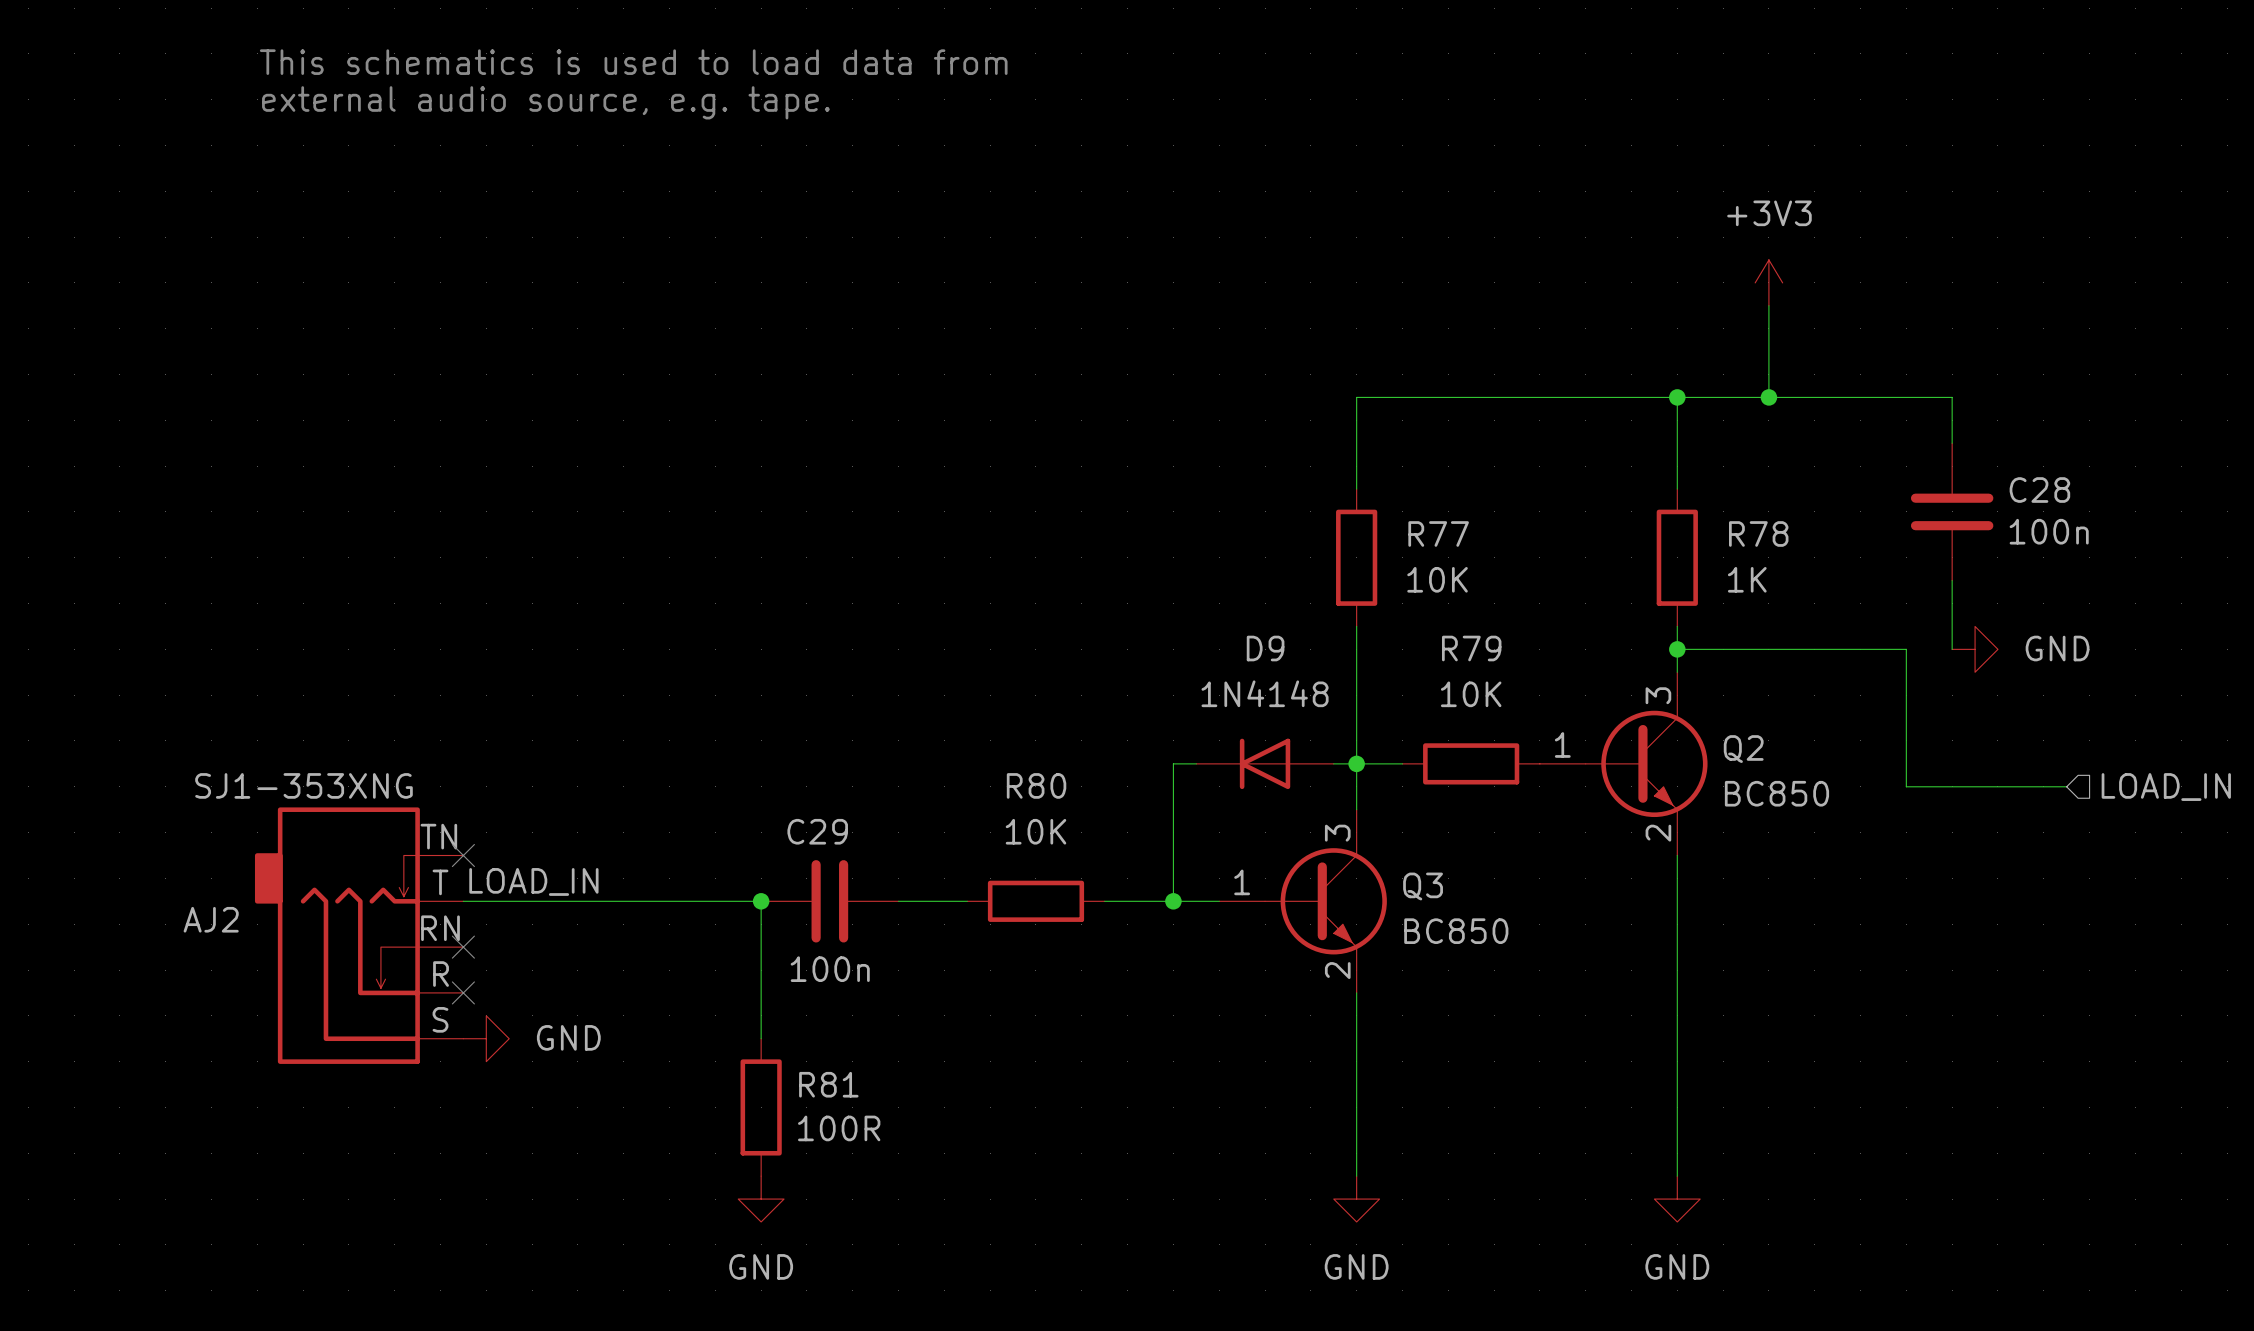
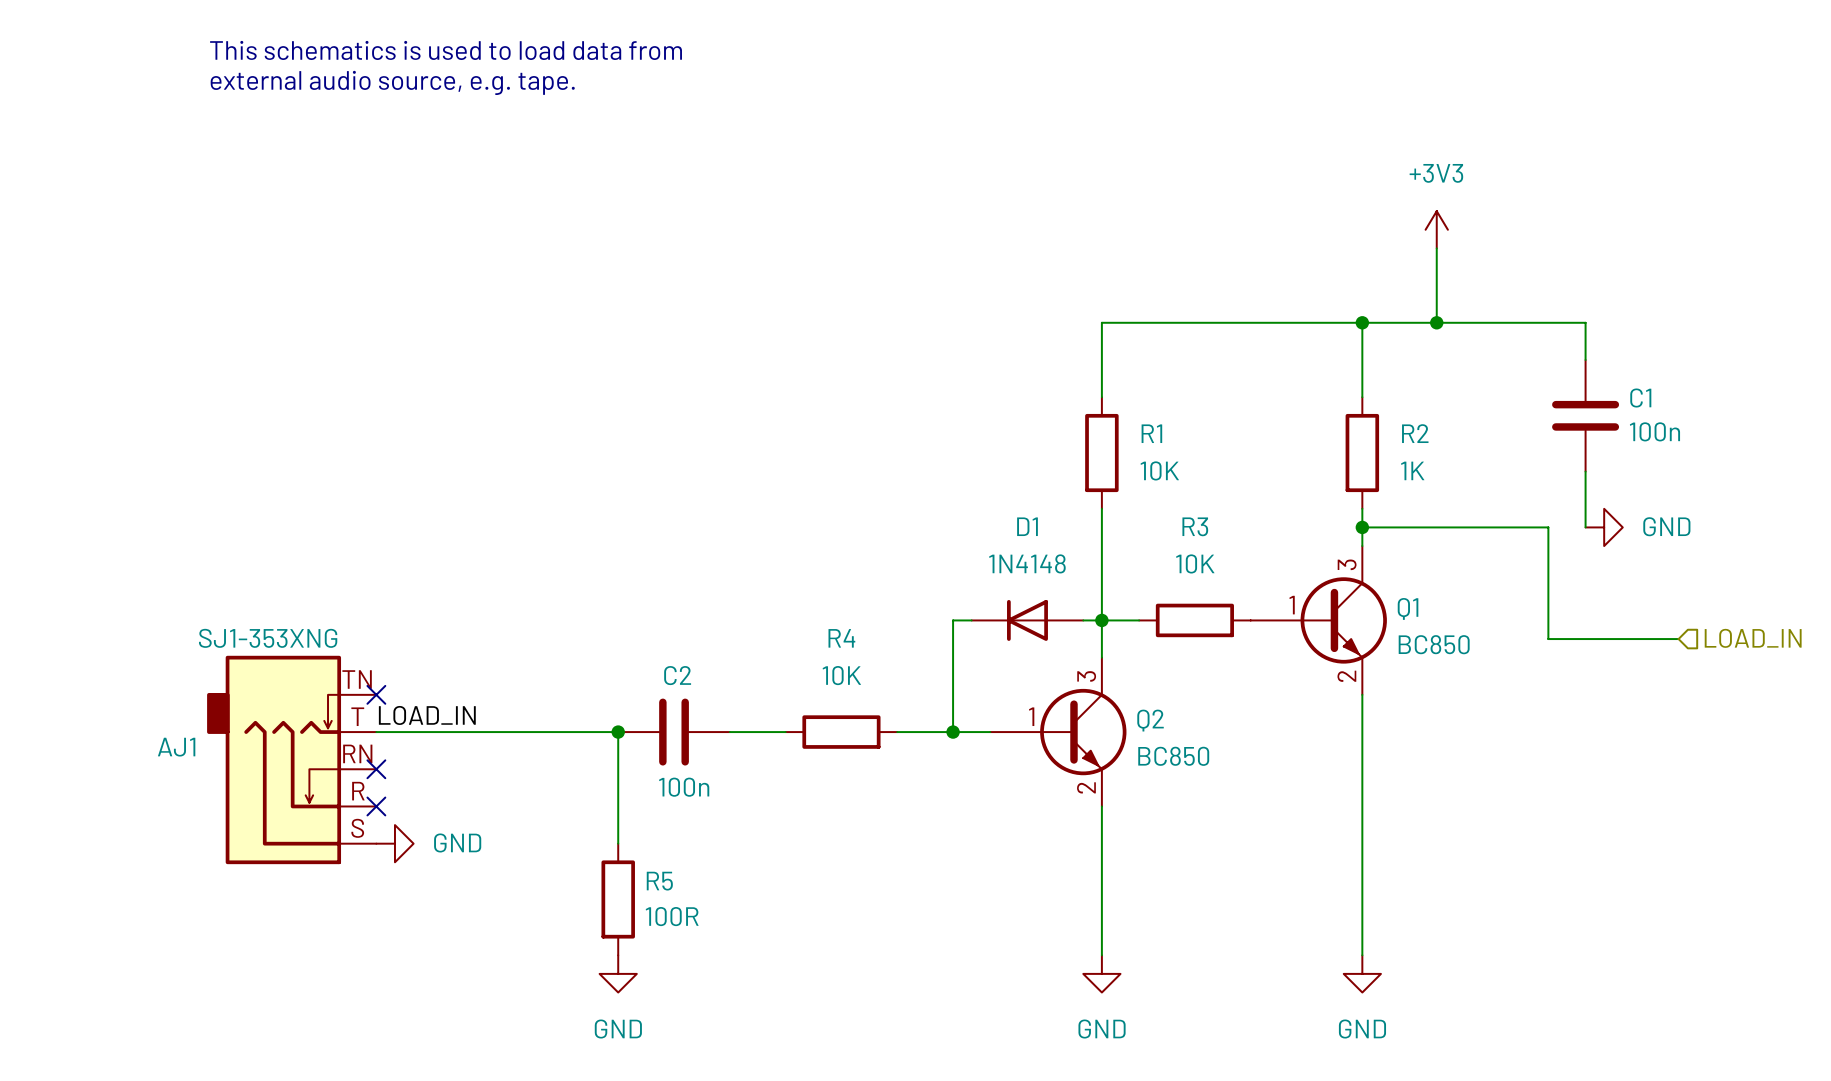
C28 name: C28 (2039, 490) -> C1 (1640, 398)
R77 name: R77 (1438, 533) -> R1 (1151, 433)
R78 name: R78 (1758, 533) -> R2 (1415, 433)
D9 name: D9 (1265, 648) -> D1 (1027, 526)
R79 name: R79 (1471, 648) -> R3 (1195, 526)
Q2 symbol: [1539, 672, 1708, 856] -> [990, 657, 1127, 807]
Q1: none -> BC850 (1318, 620)
R80 name: R80 (1036, 785) -> R4 (841, 638)
C29 name: C29 (817, 831) -> C2 (677, 675)
Q3: BC850 (1303, 901) -> none
AJ2 name: AJ2 (211, 919) -> AJ1 (176, 747)
R81 name: R81 (828, 1084) -> R5 (659, 881)

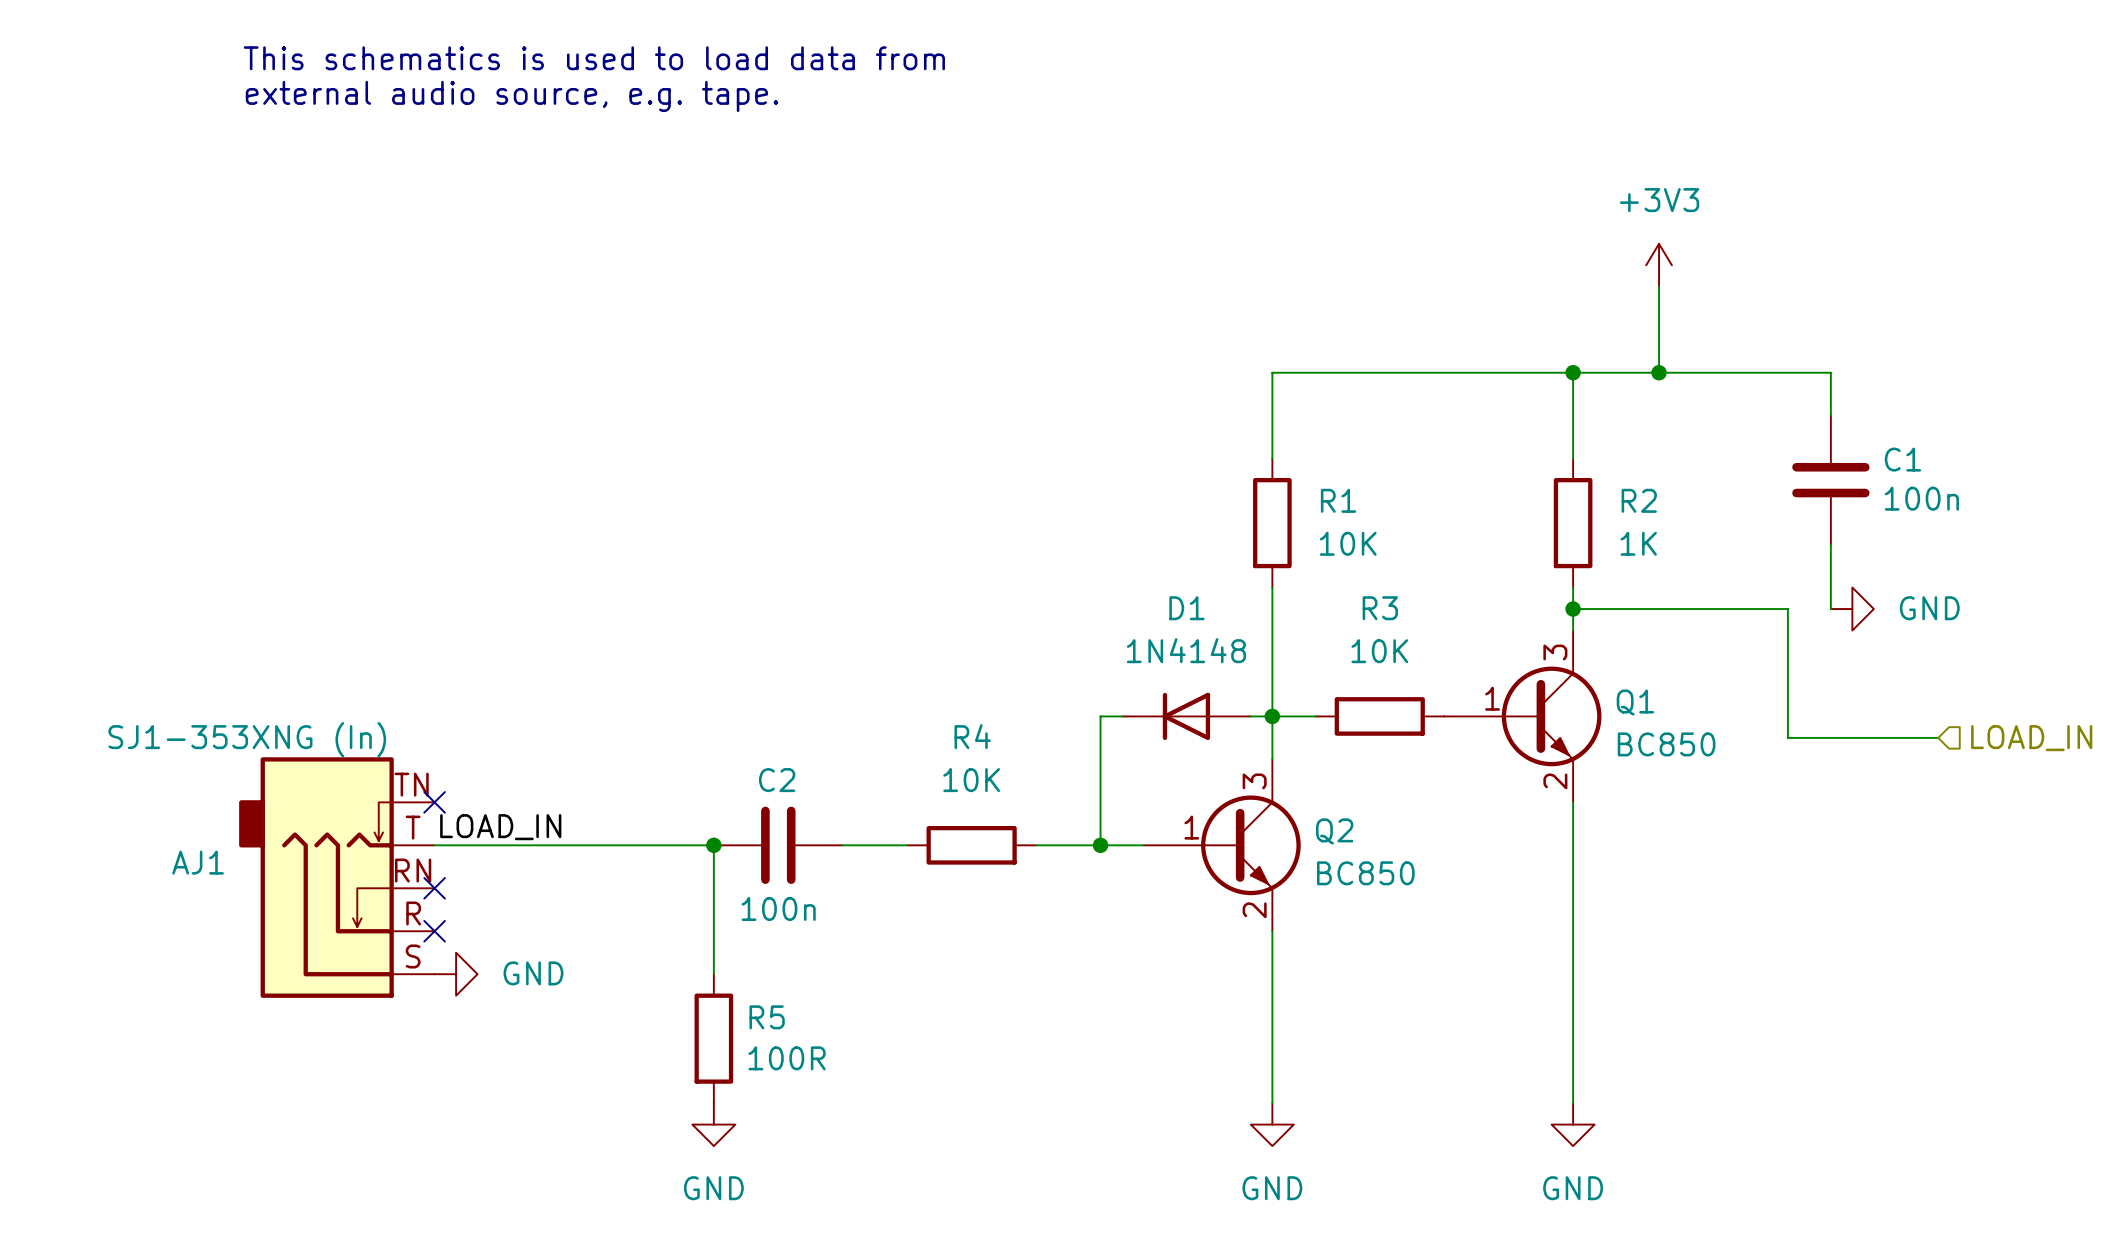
AJ1 value: SJ1-353XNG (268, 638) -> SJ1-353XNG (In) (247, 739)

